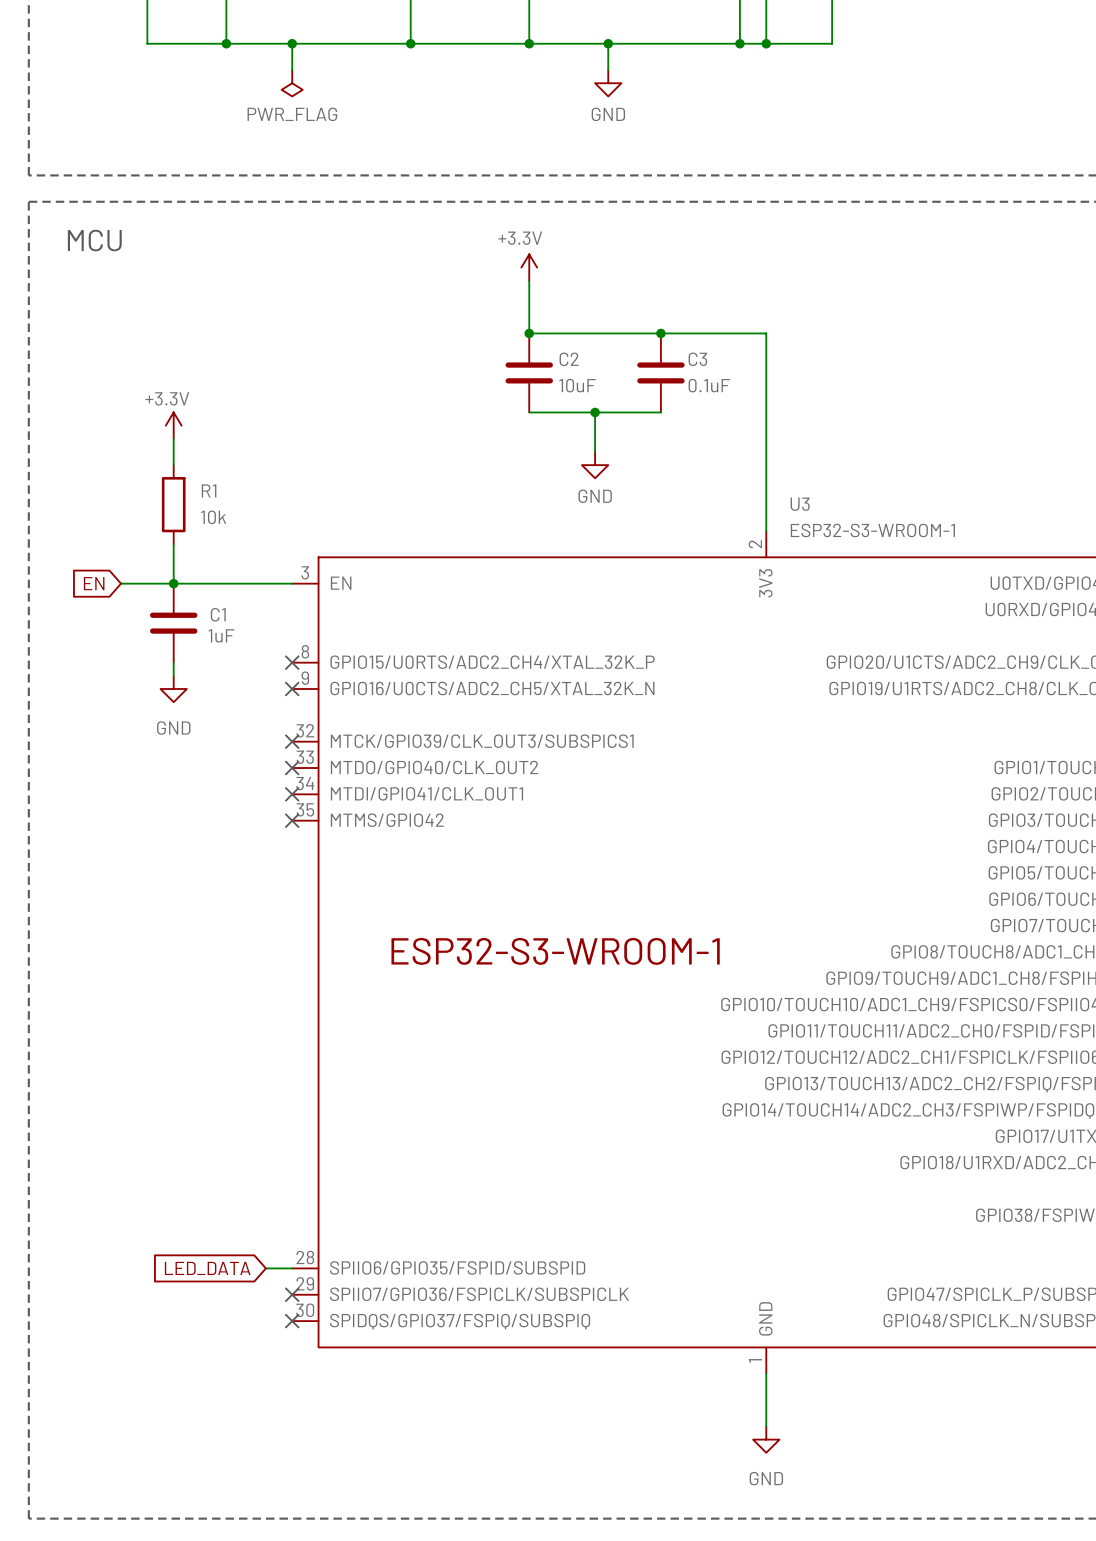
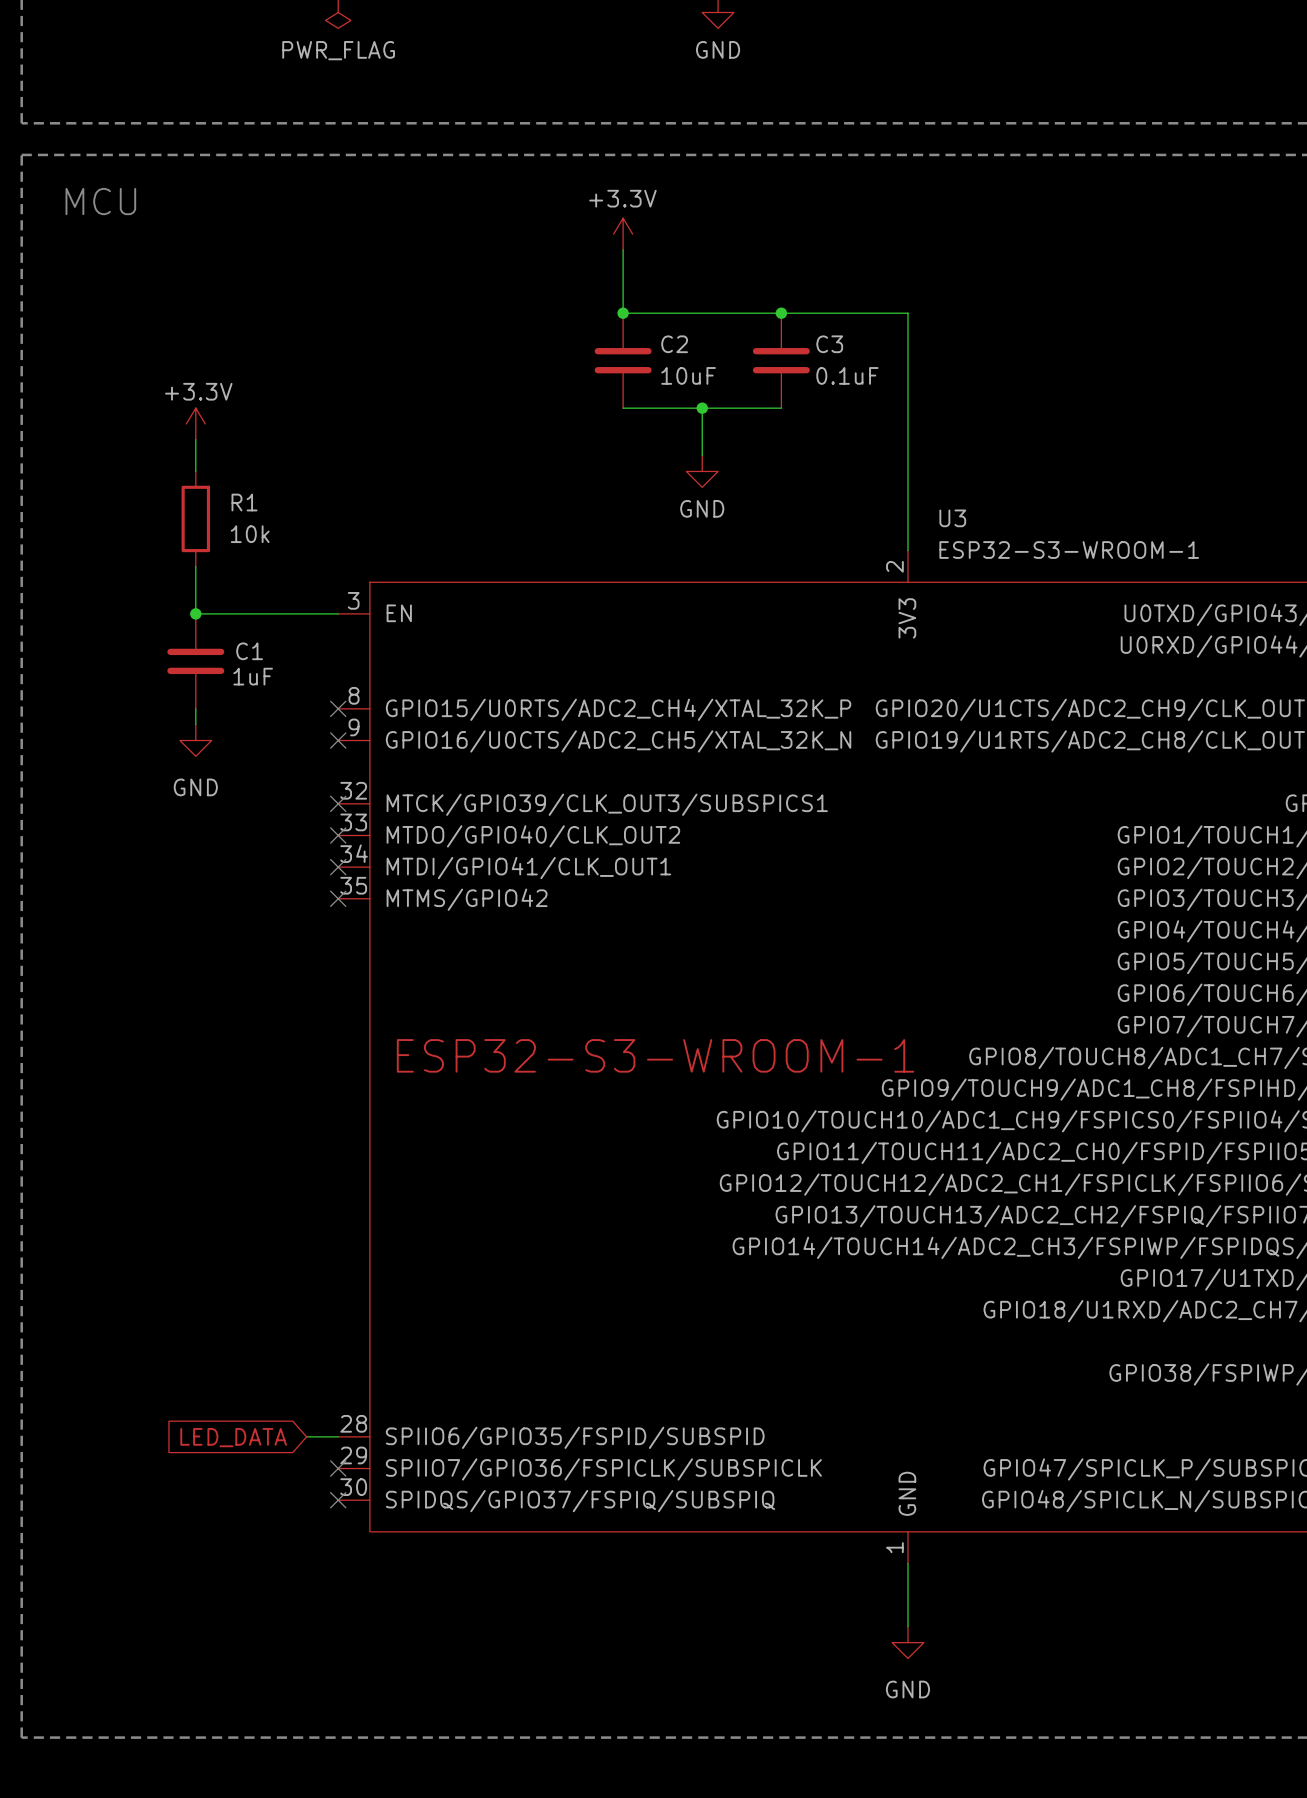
global label: EN (94, 583) -> none
wire: (121, 583) (173, 583) -> none

